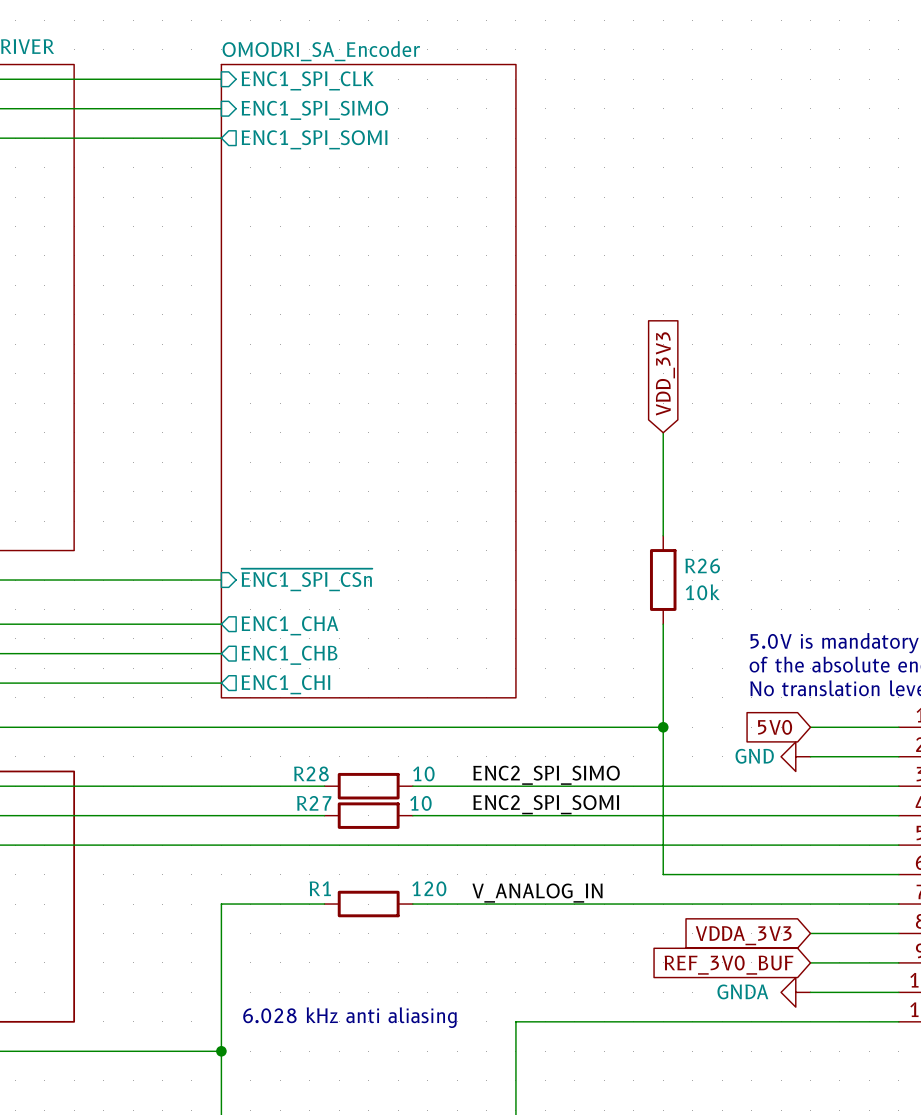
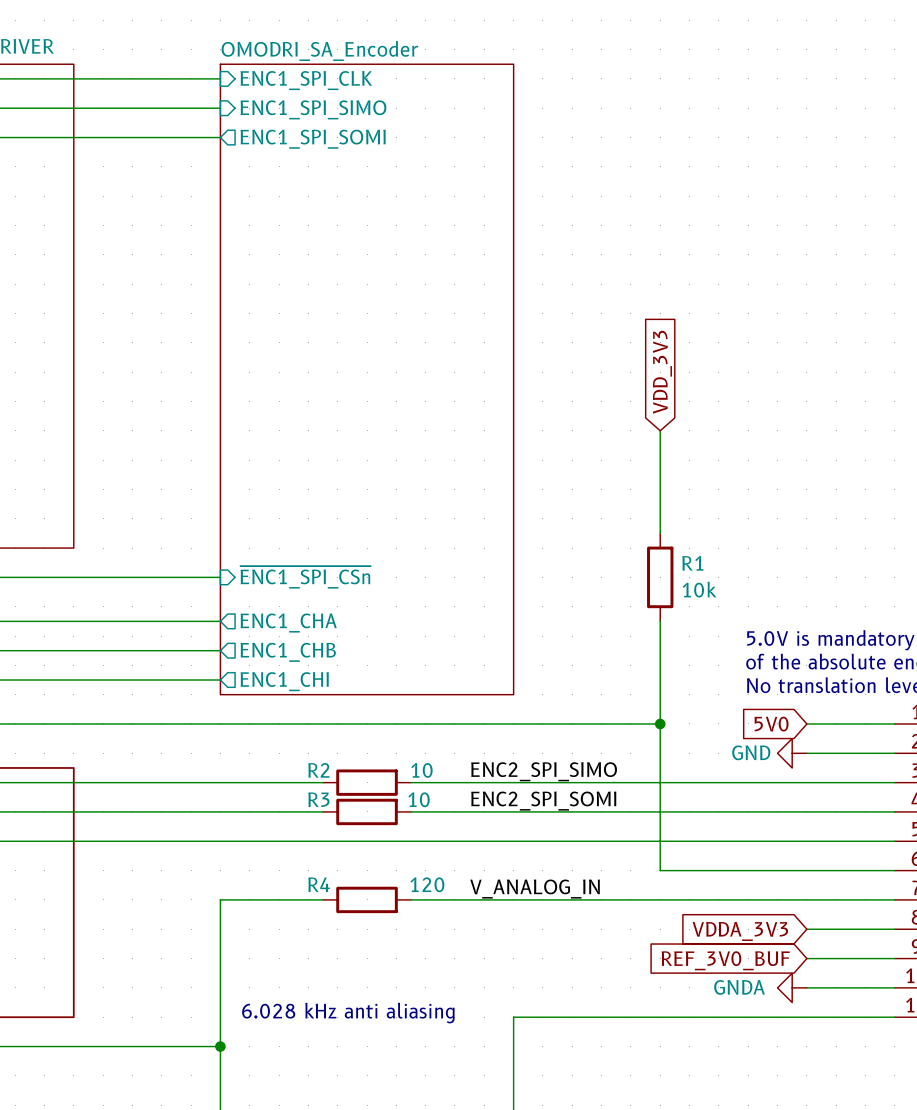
R26 name: R26 (702, 566) -> R1 (692, 563)
R28 name: R28 (311, 773) -> R2 (318, 770)
R27 name: R27 (314, 803) -> R3 (318, 799)
R1 name: R1 (320, 888) -> R4 (319, 884)

